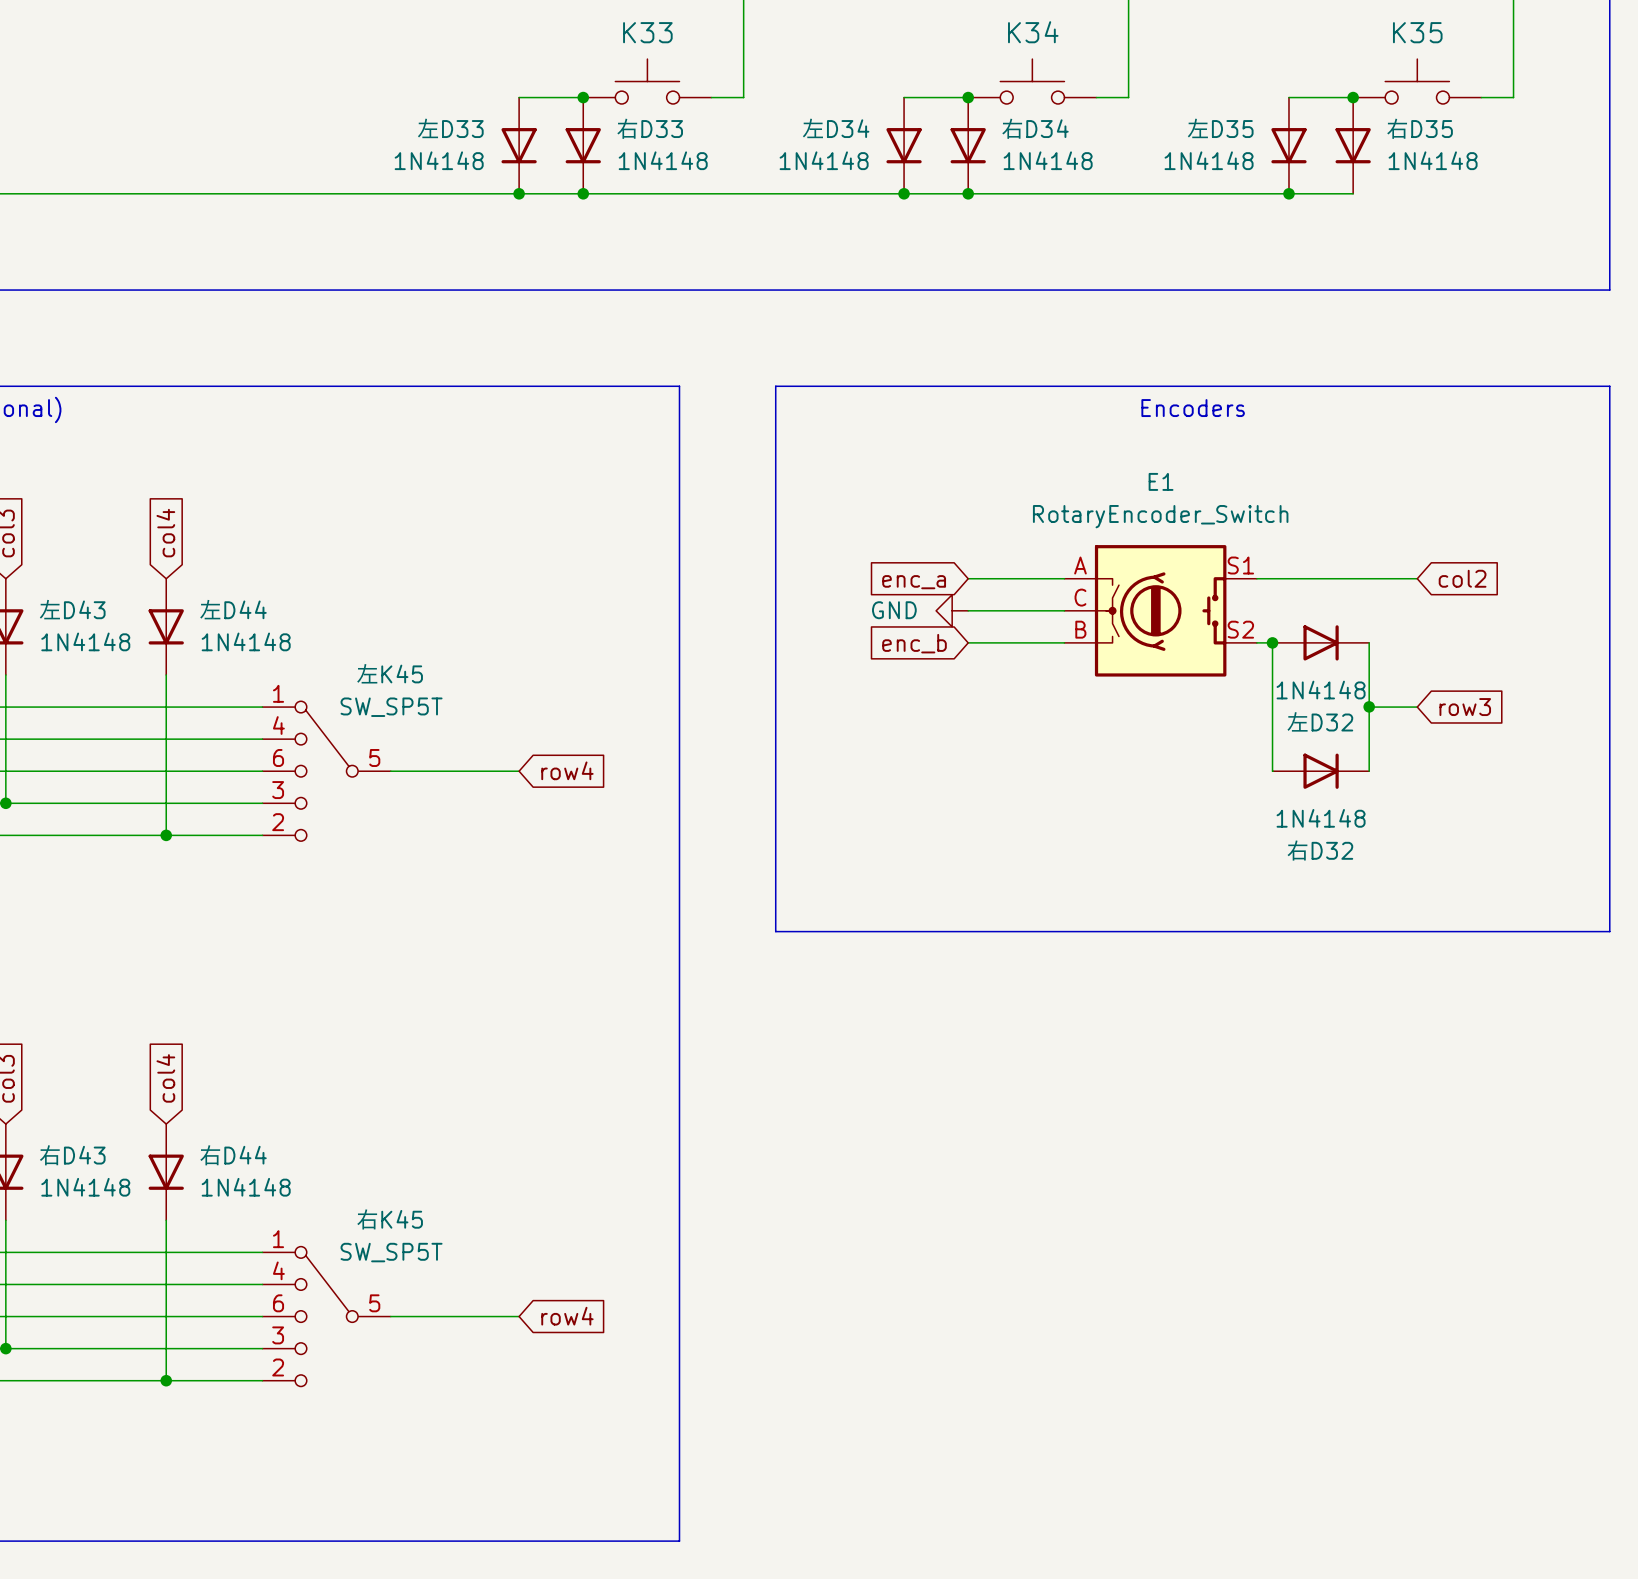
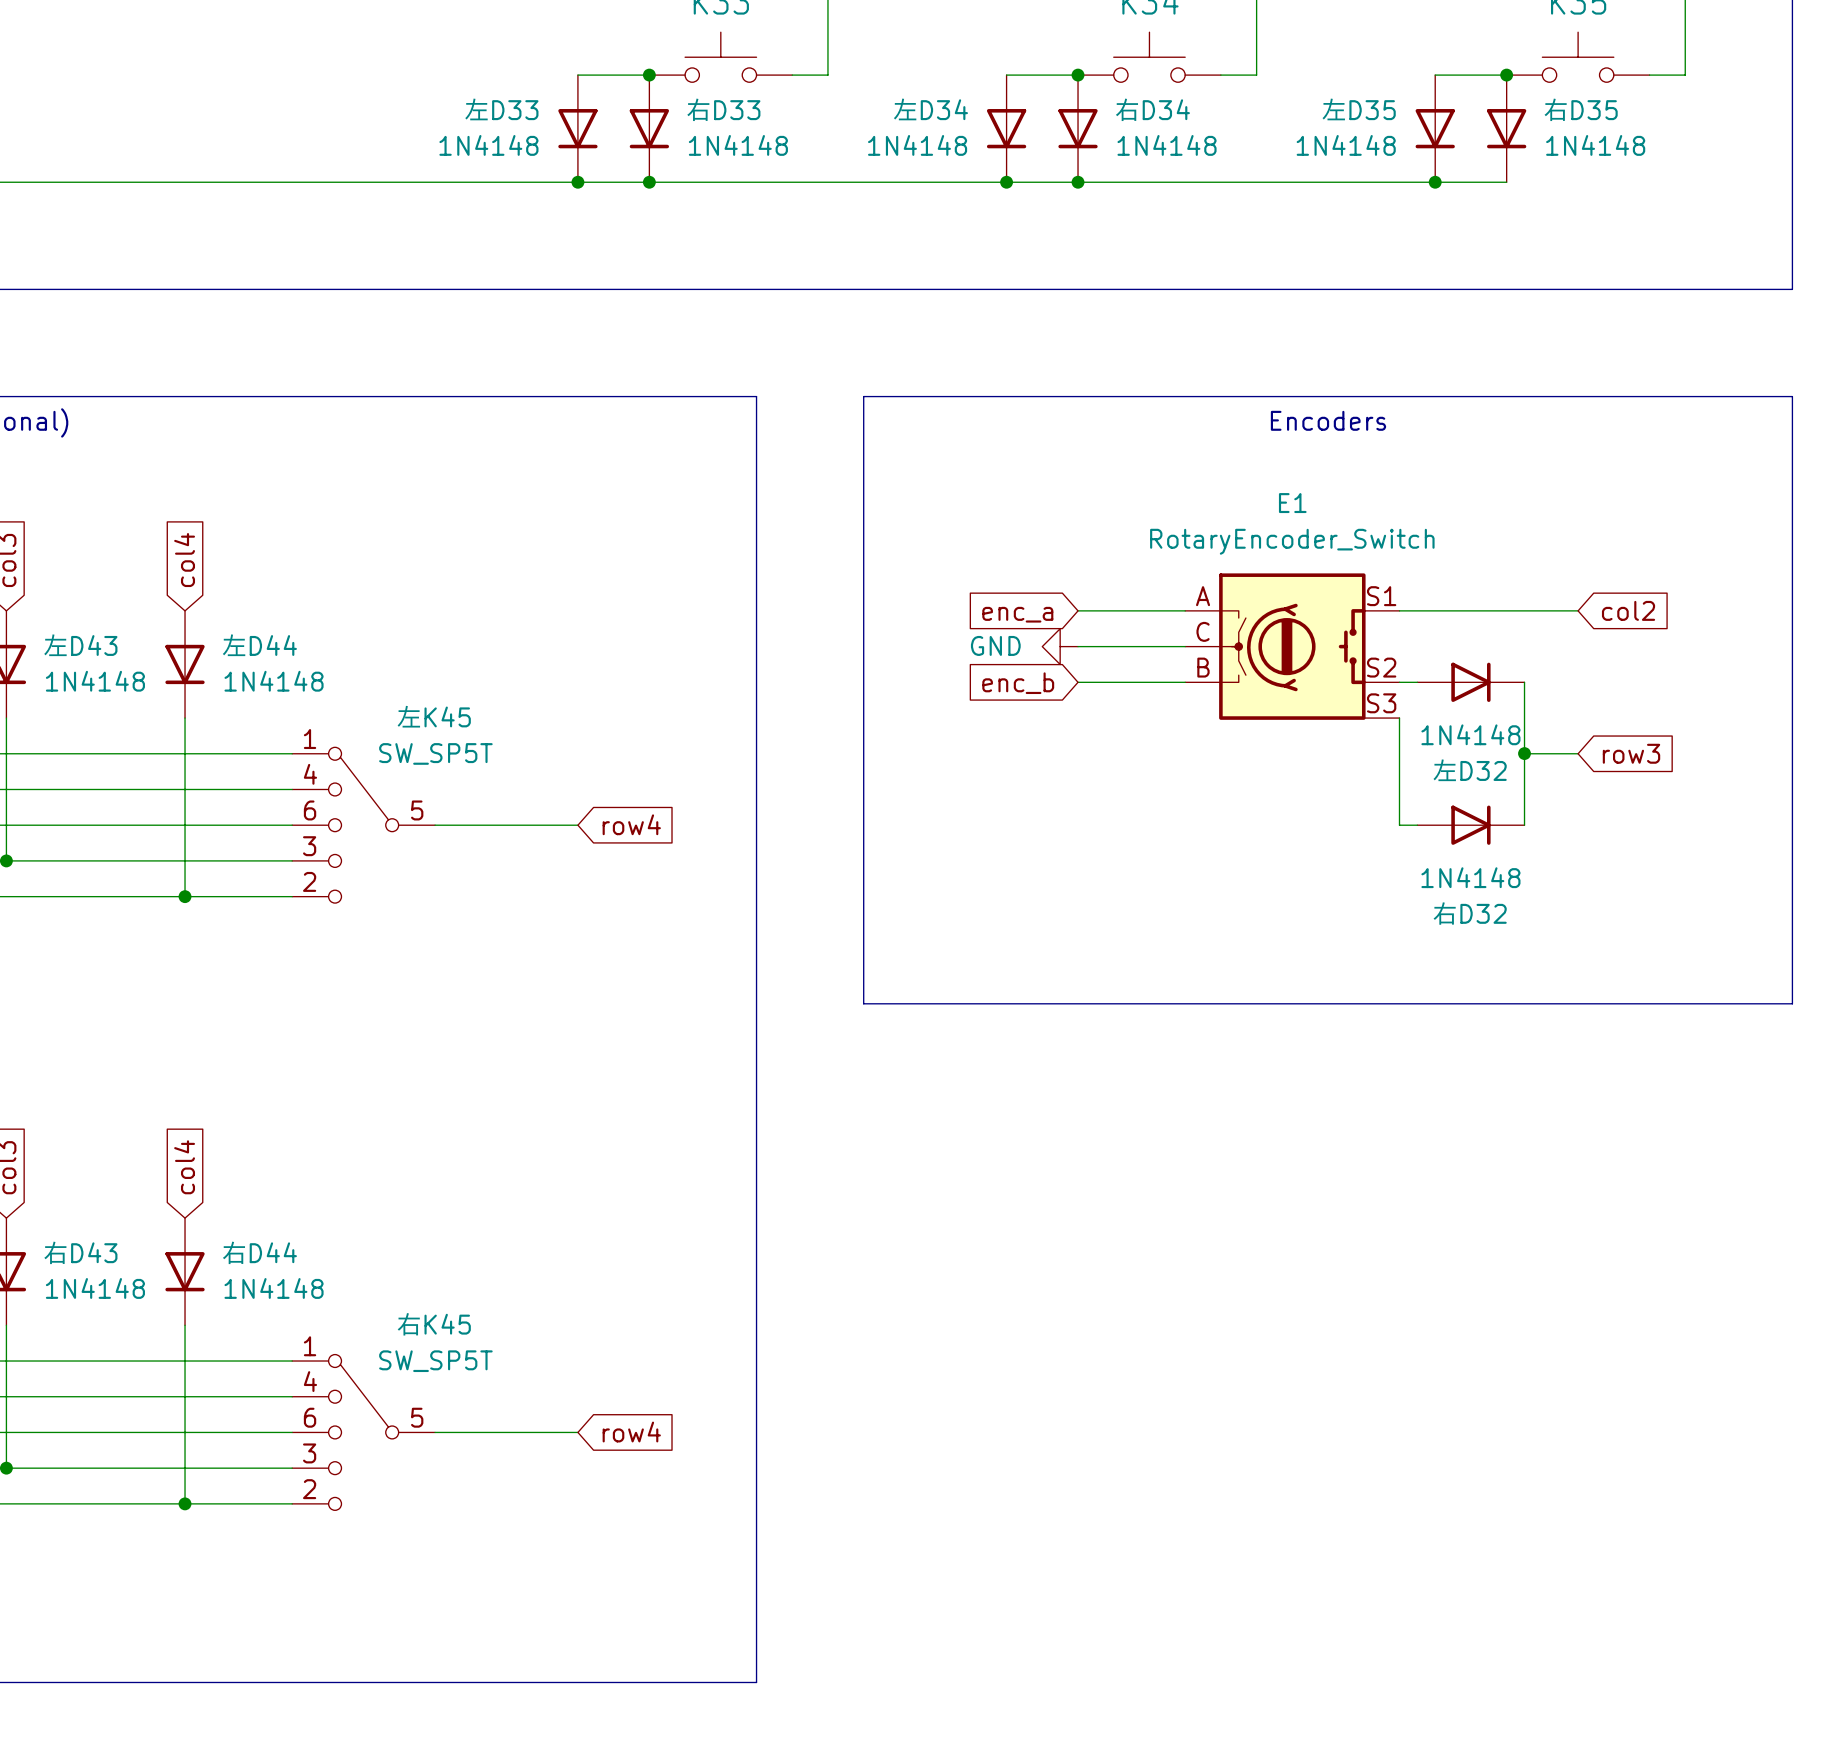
E1 symbol: [1064, 545, 1257, 677] -> [1185, 573, 1400, 720]
wire: (1272, 642) (1272, 771) -> (1399, 718) (1399, 825) (1416, 825)
junction: (1272, 642) -> none

